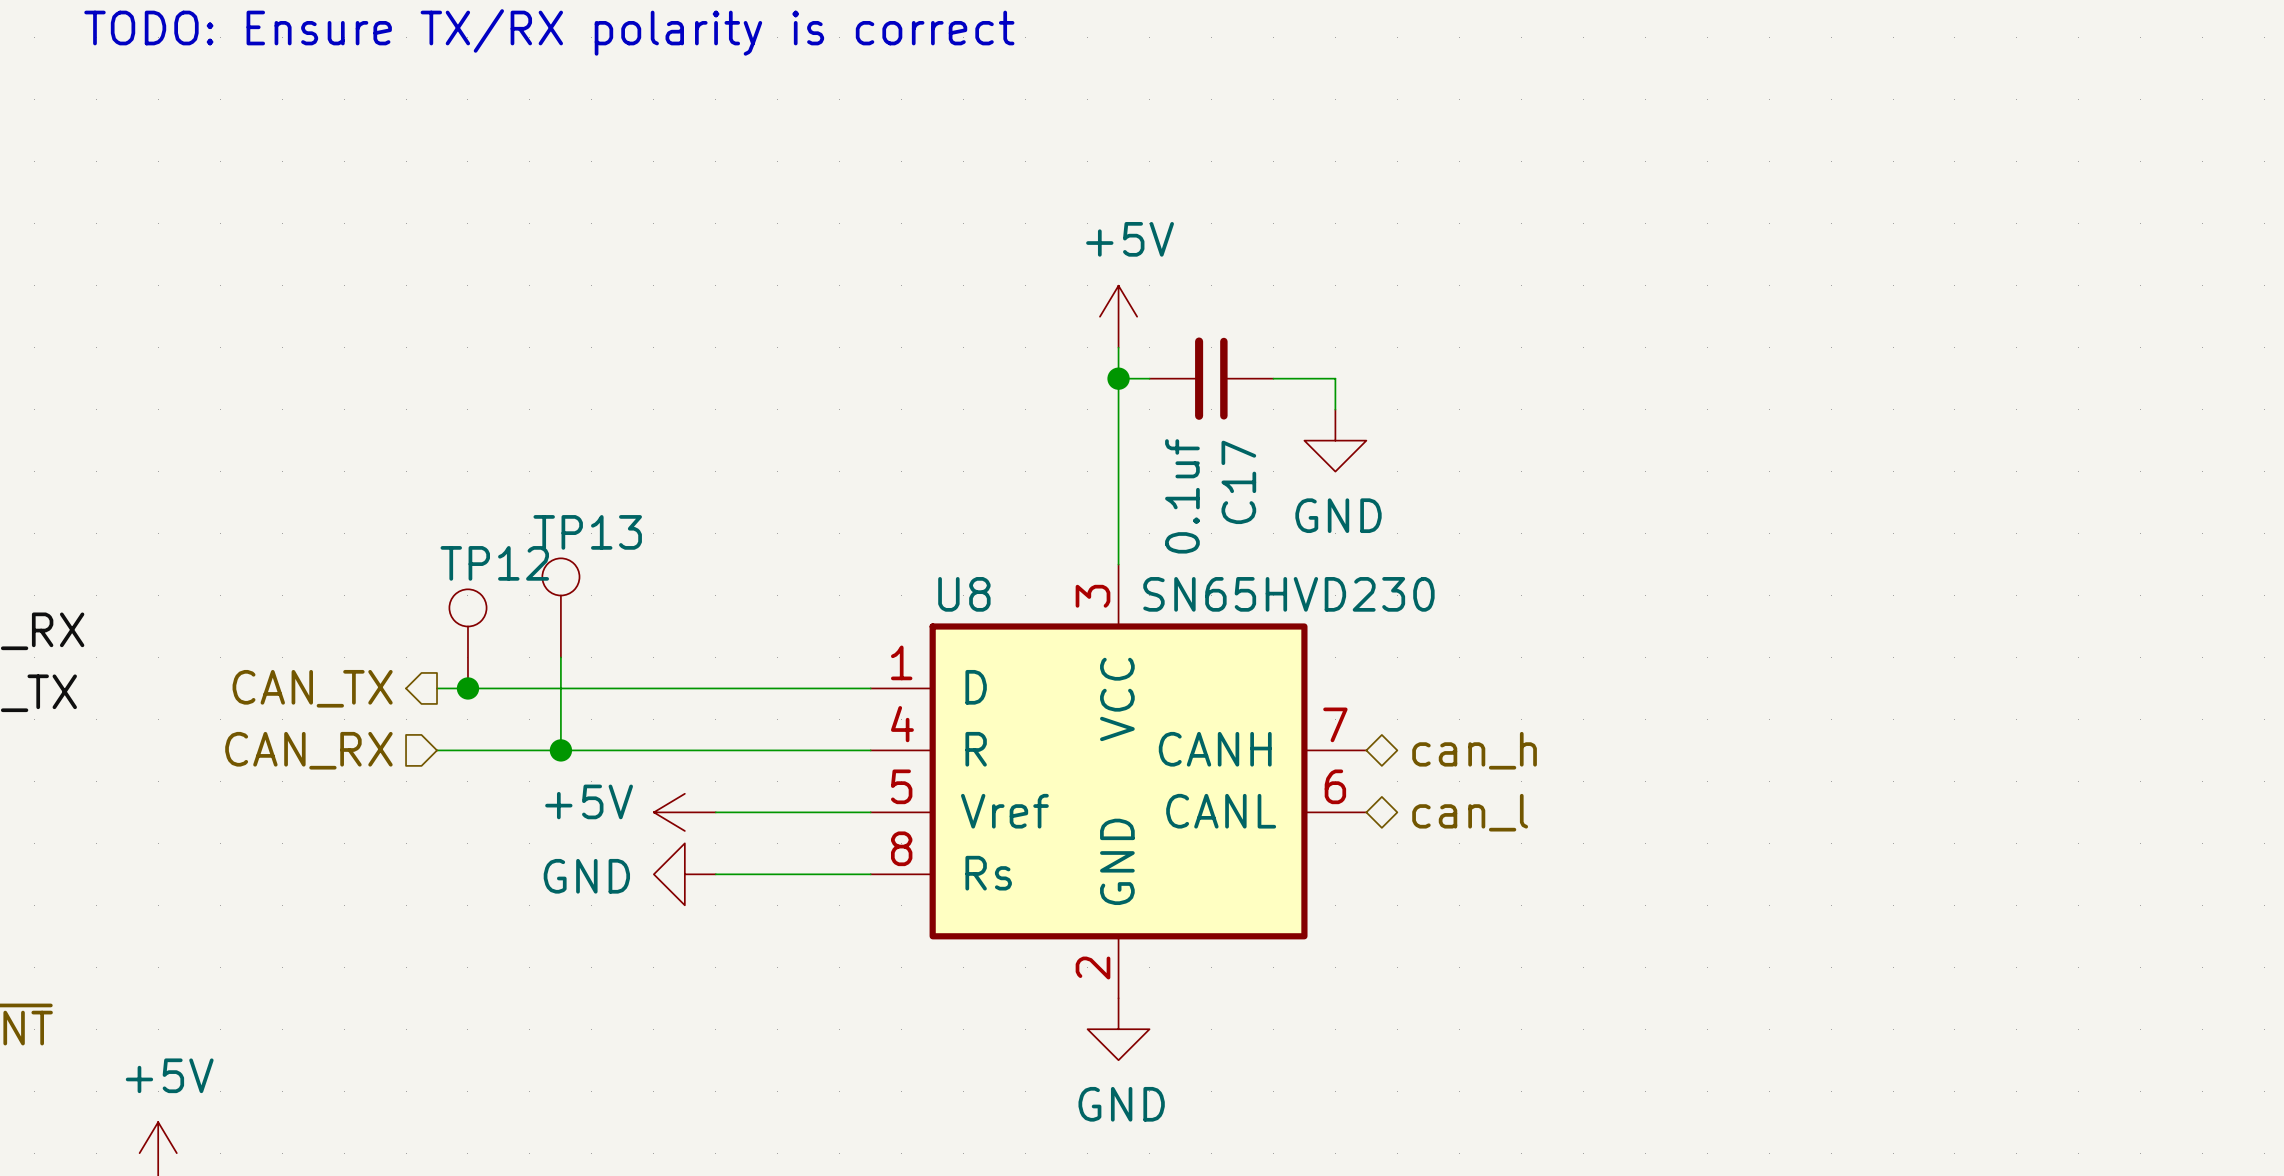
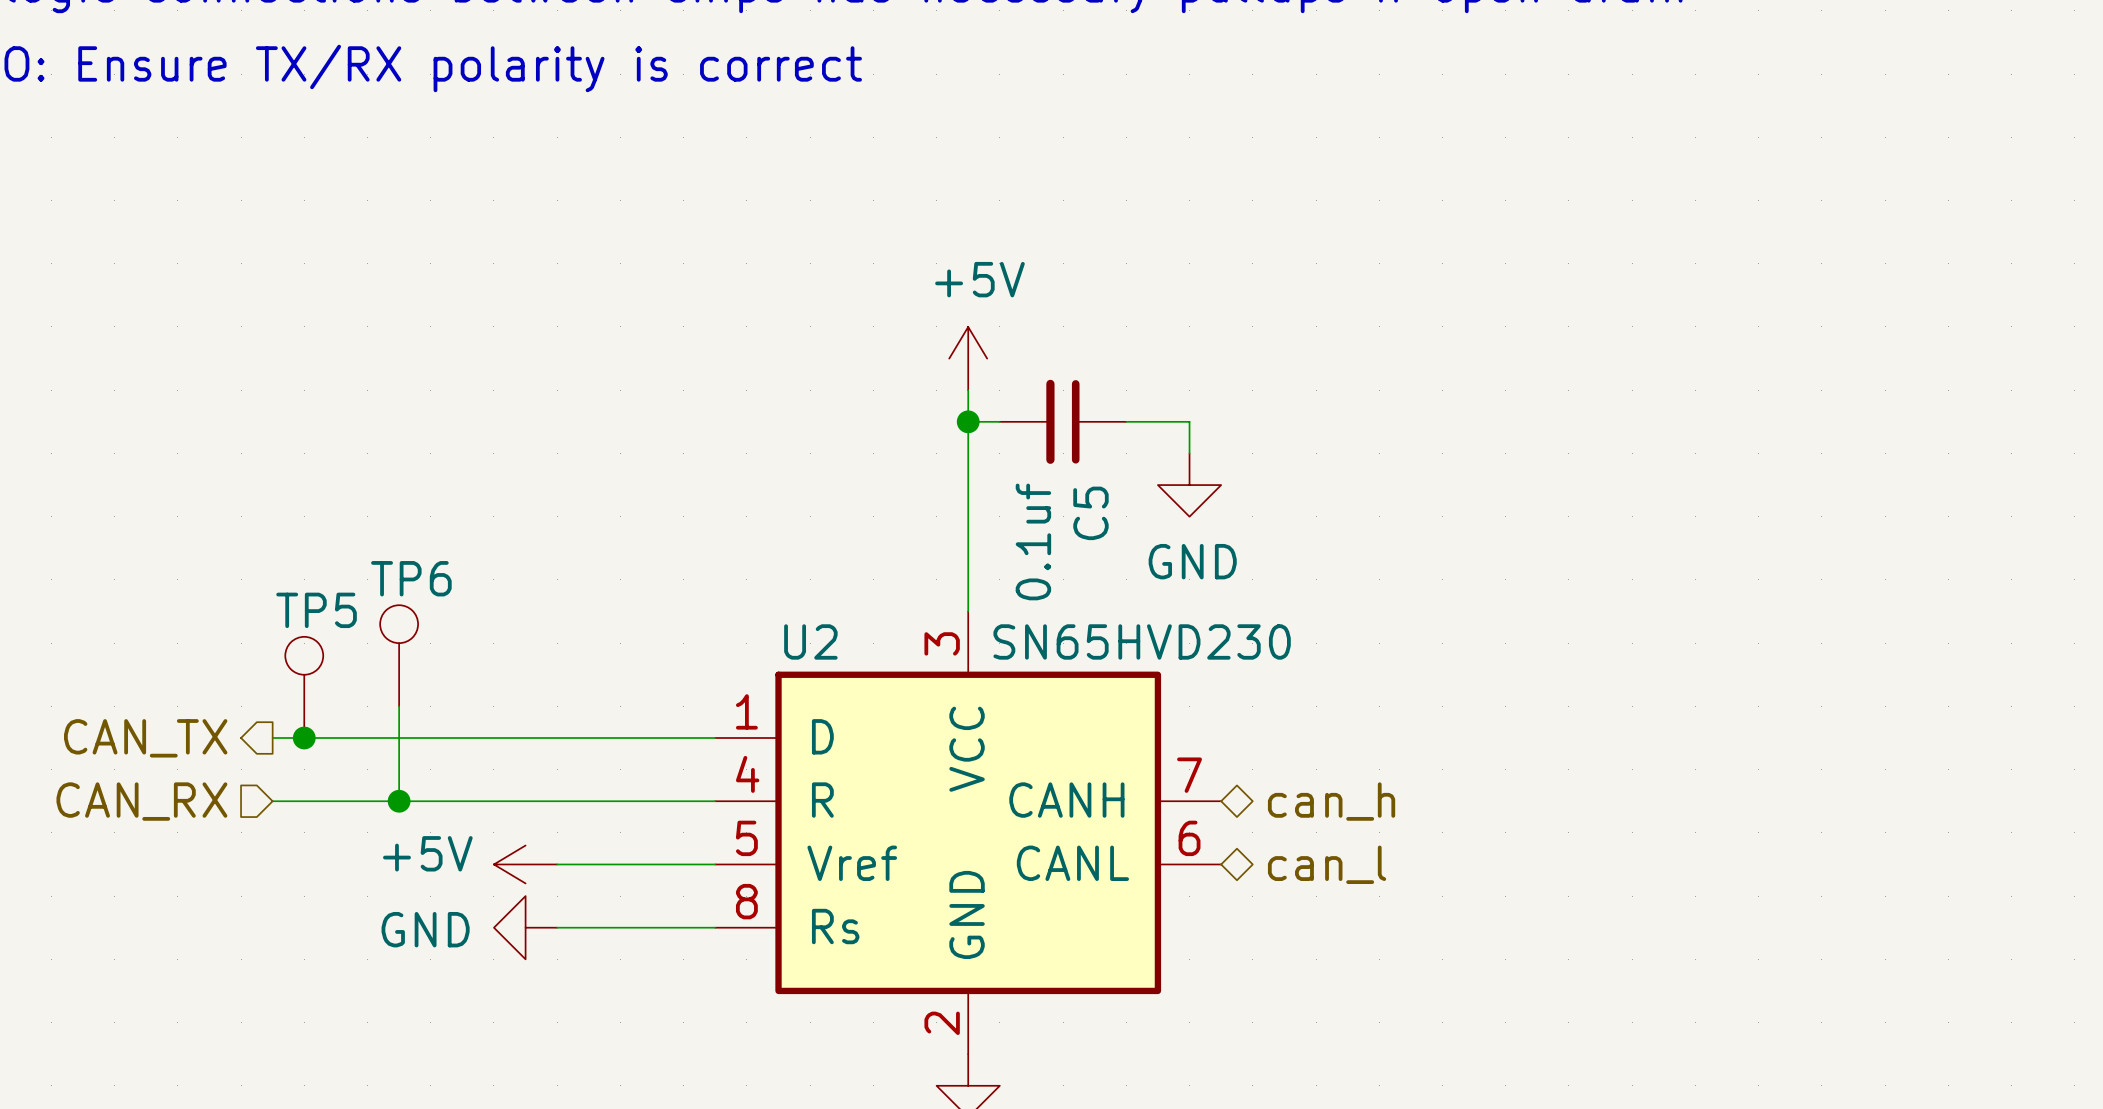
C17 name: C17 (1238, 482) -> C5 (1090, 513)
TP13 name: TP13 (587, 532) -> TP6 (411, 578)
TP12 name: TP12 (494, 563) -> TP5 (316, 610)
U8 name: U8 (964, 594) -> U2 (810, 641)

